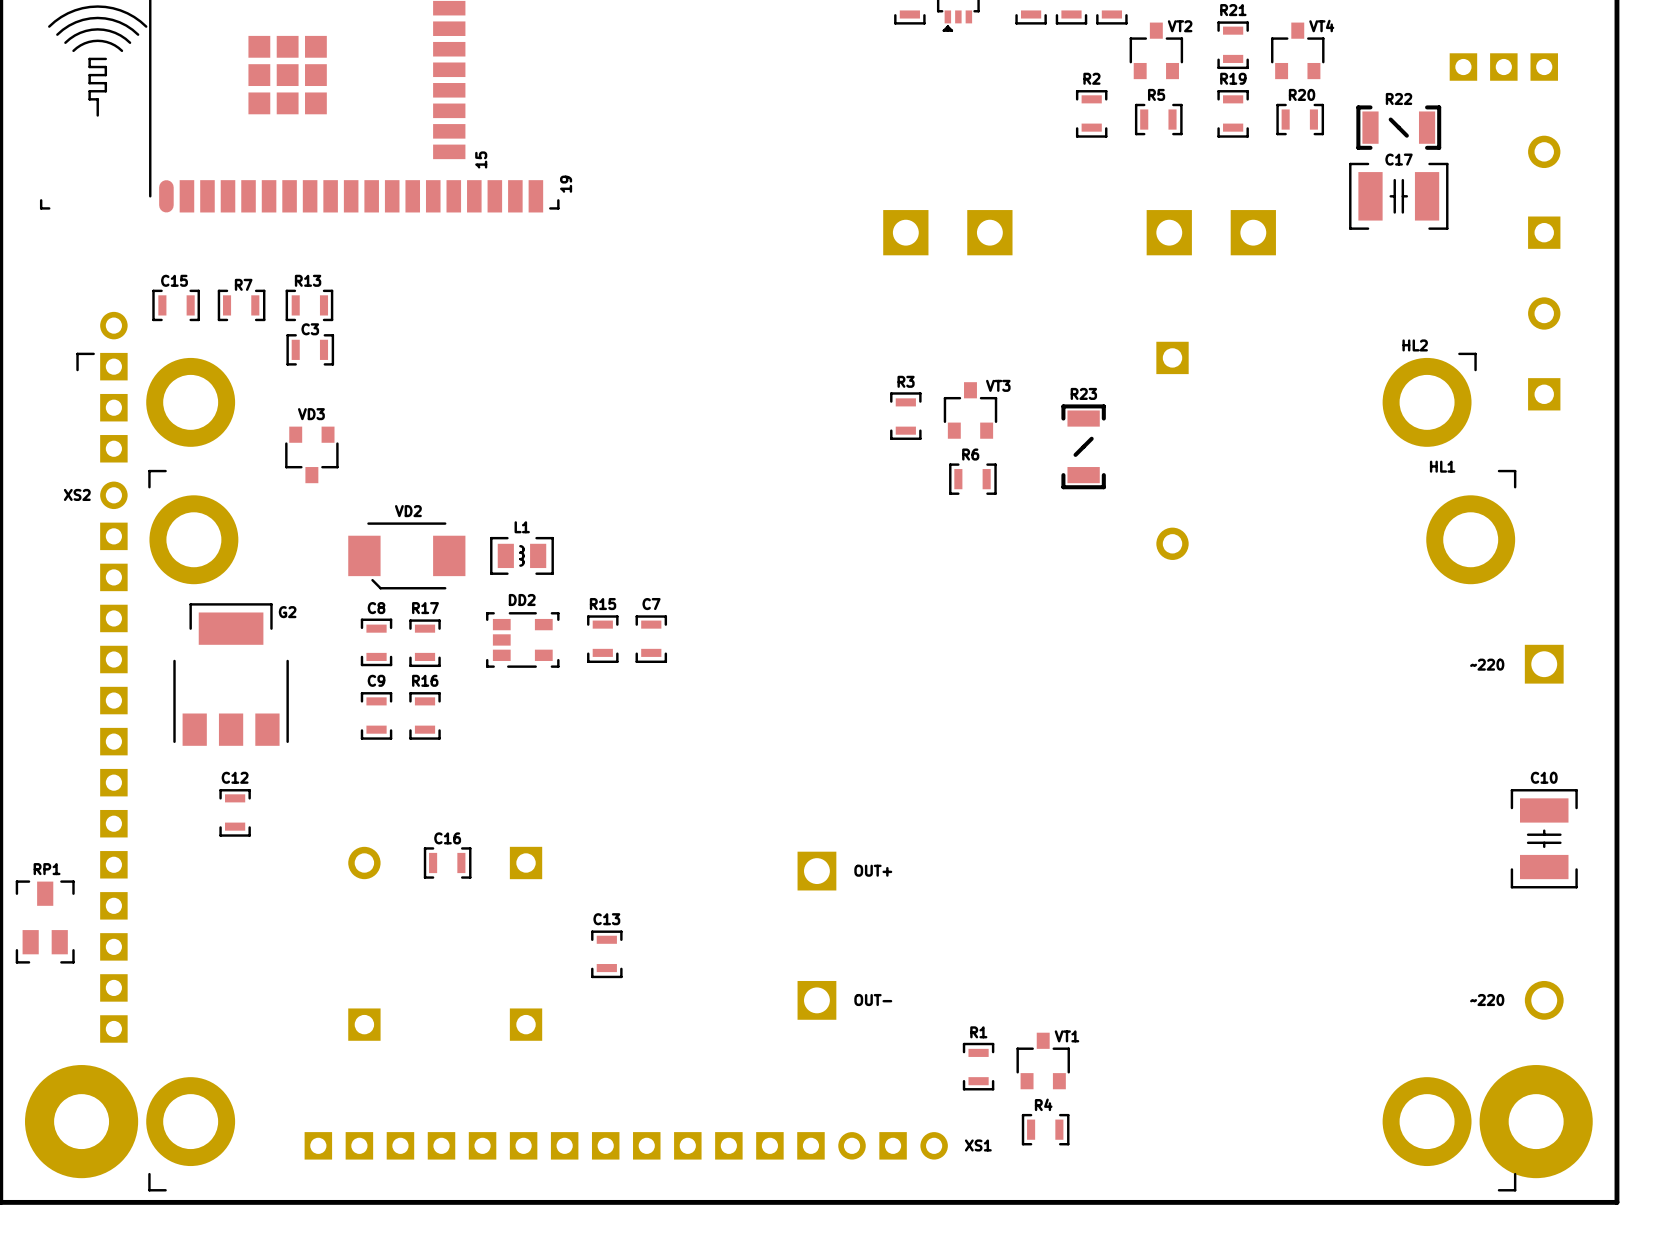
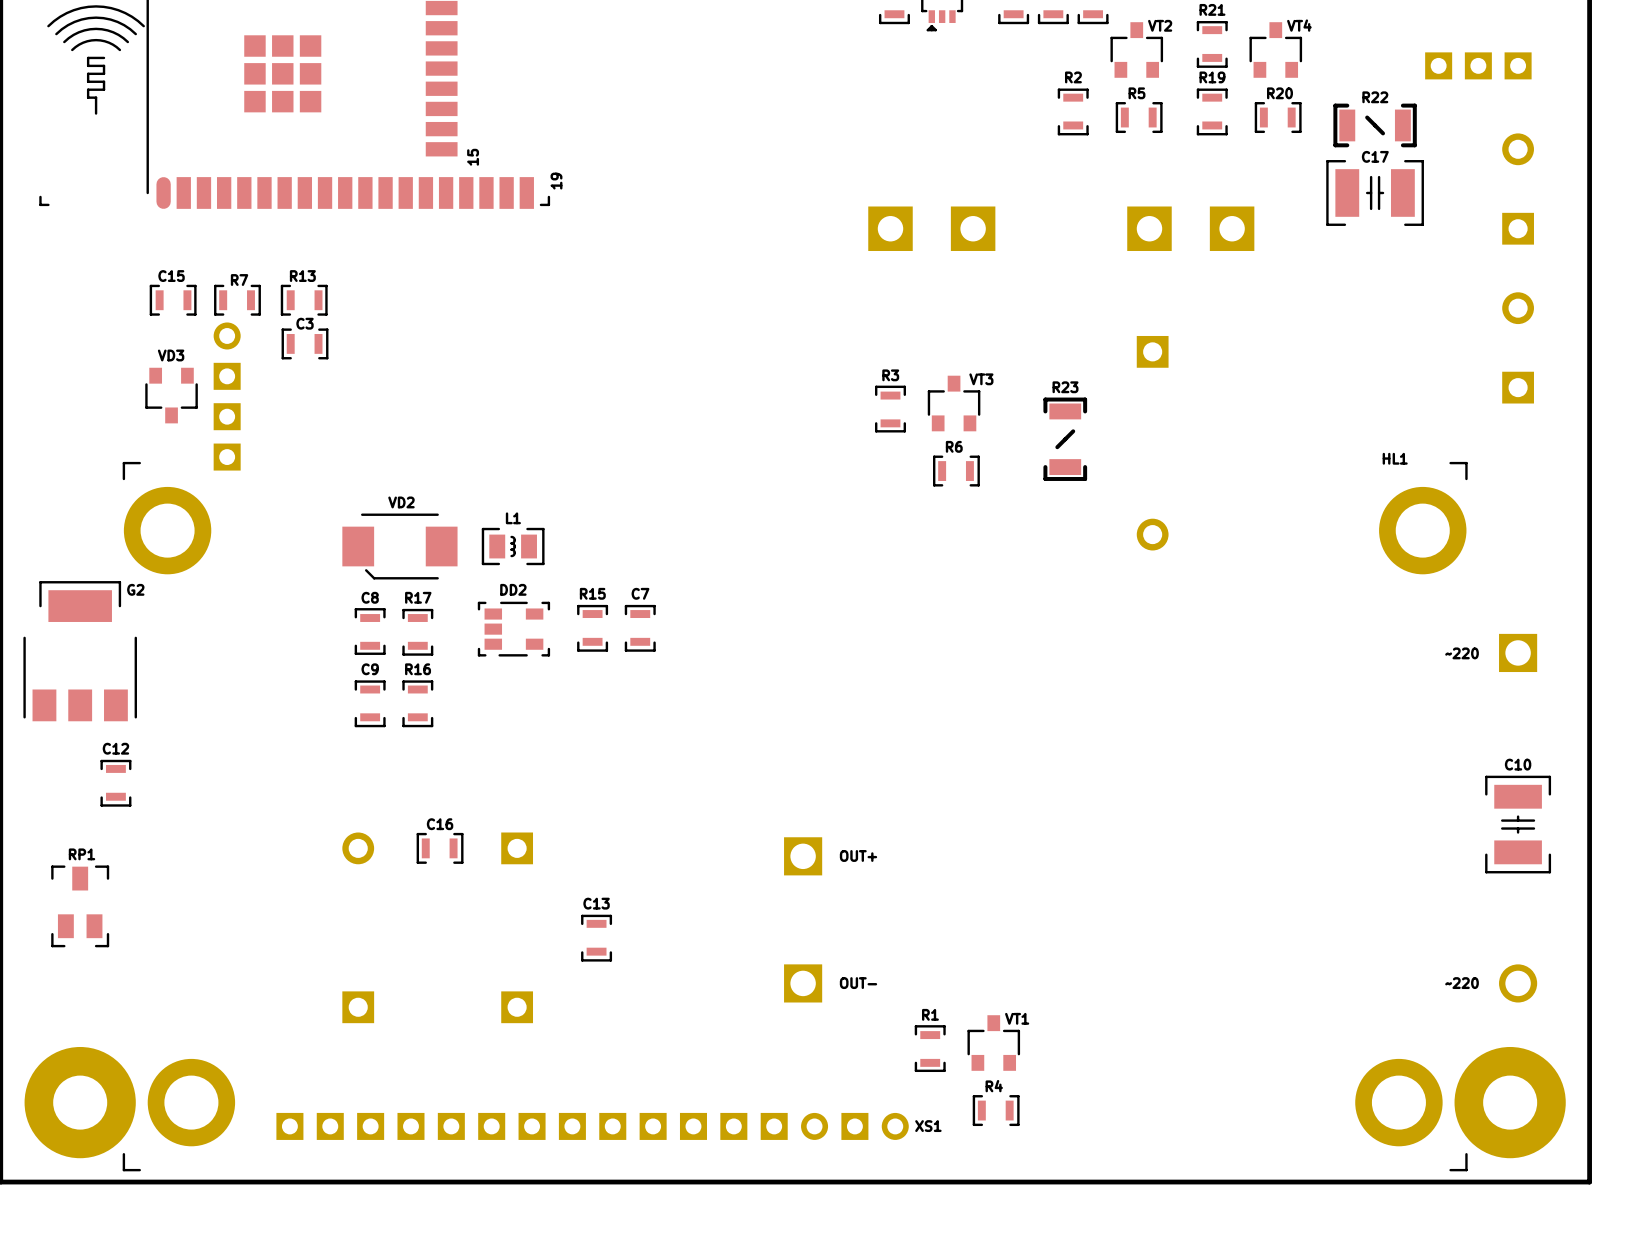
part position: (113, 387) -> (227, 396)
VD3 position: (311, 454) -> (171, 395)
HL1 footprint: [148, 469, 1517, 1192] -> [122, 461, 1468, 1172]
text: XS2 (77, 494) -> none
G2 position: (231, 674) -> (80, 651)
HL2: (776, 759) -> none
C12 position: (235, 812) -> (115, 783)
RP1 position: (45, 921) -> (80, 906)
VT1 position: (1043, 1060) -> (993, 1043)
R1 position: (978, 1066) -> (930, 1048)
R4 position: (1045, 1129) -> (996, 1110)
text position: XS1 (978, 1145) -> XS1 (928, 1126)

